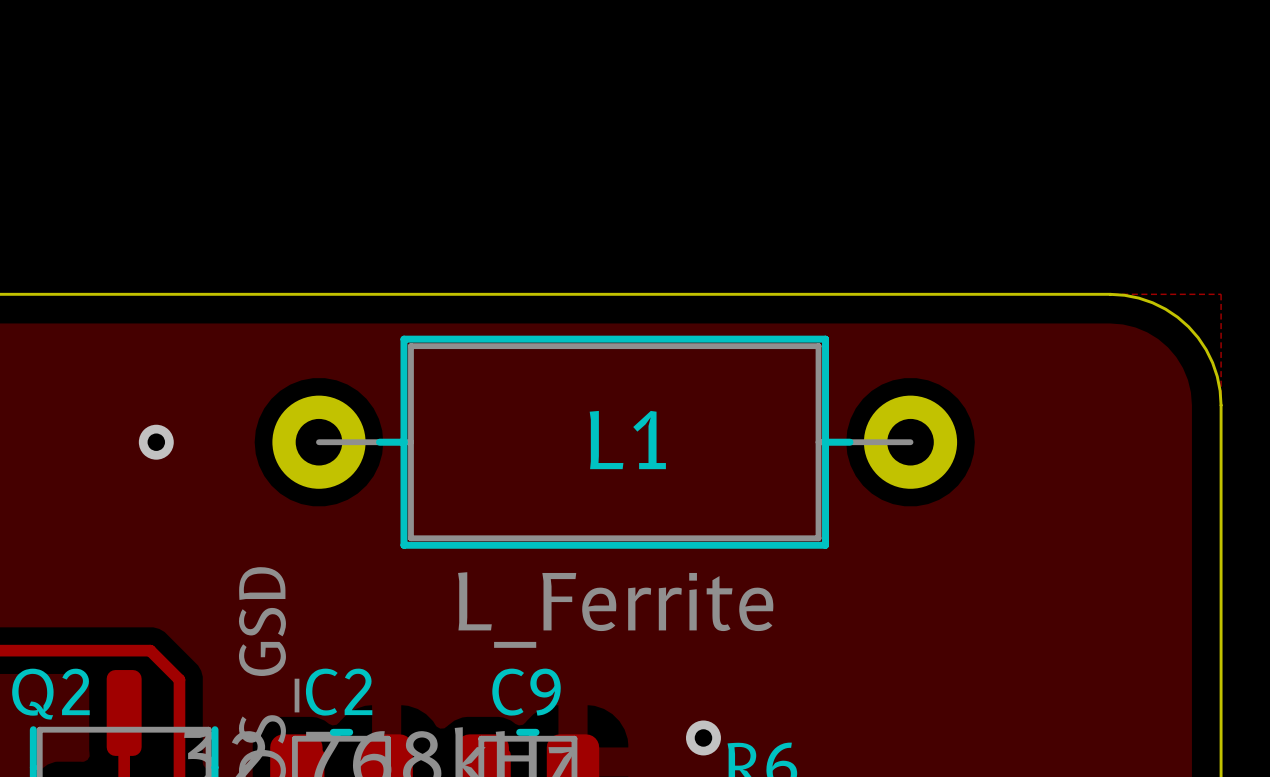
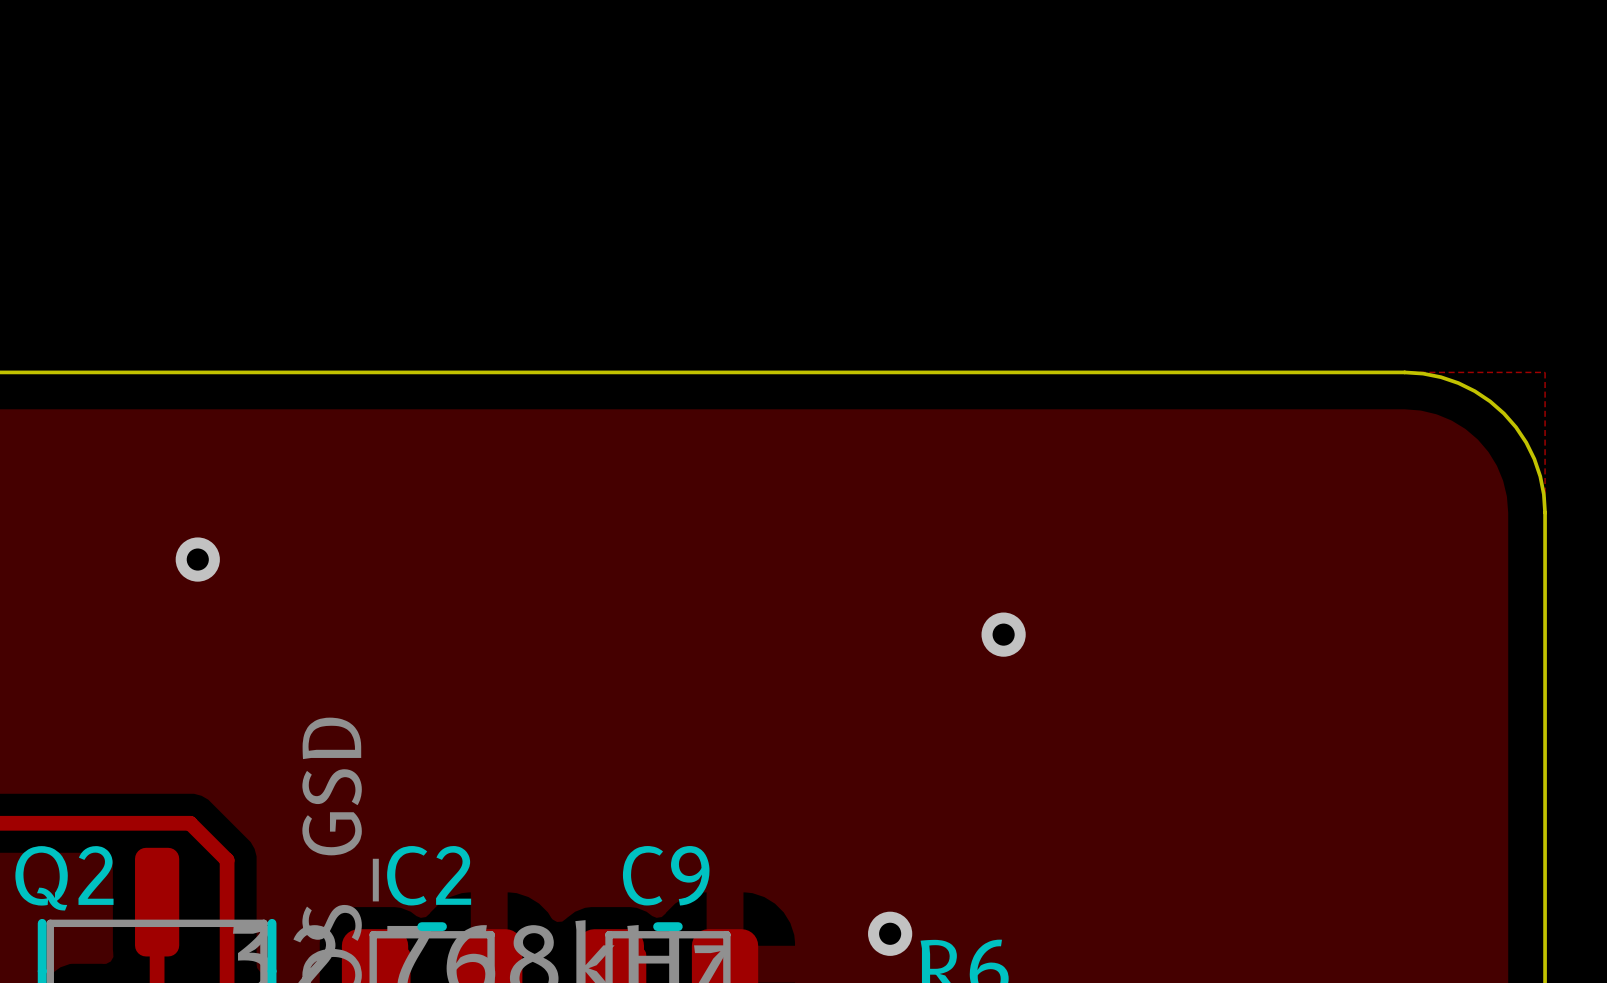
L1: L_Ferrite (614, 442) -> none
via: none -> (1003, 634)

